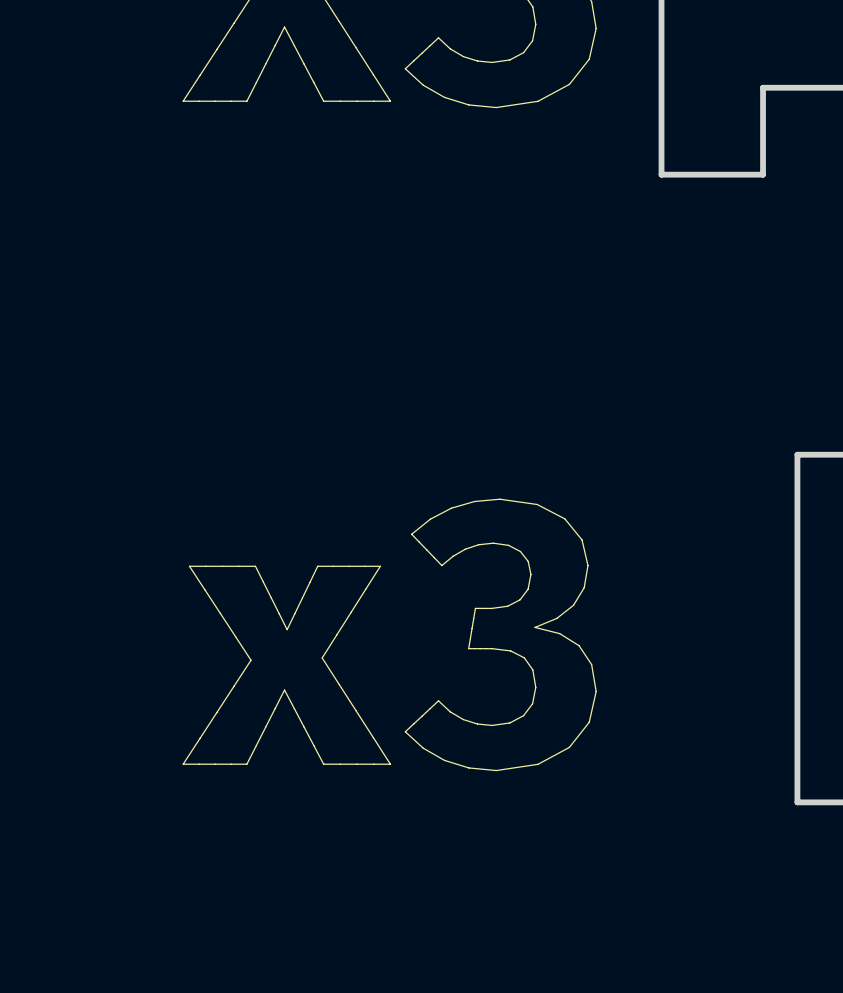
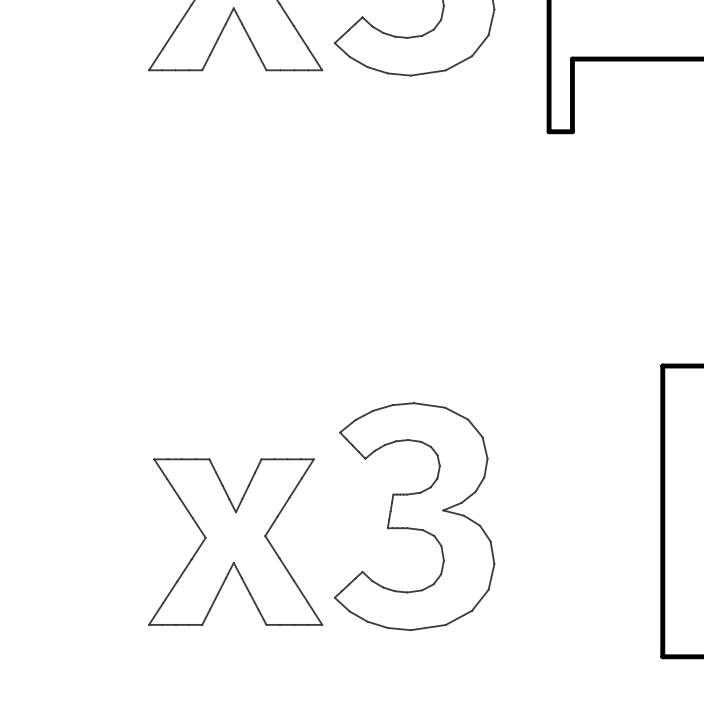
board edge: (763, 87) (763, 174) (689, 174) -> (634, 59) (572, 59) (572, 131)

